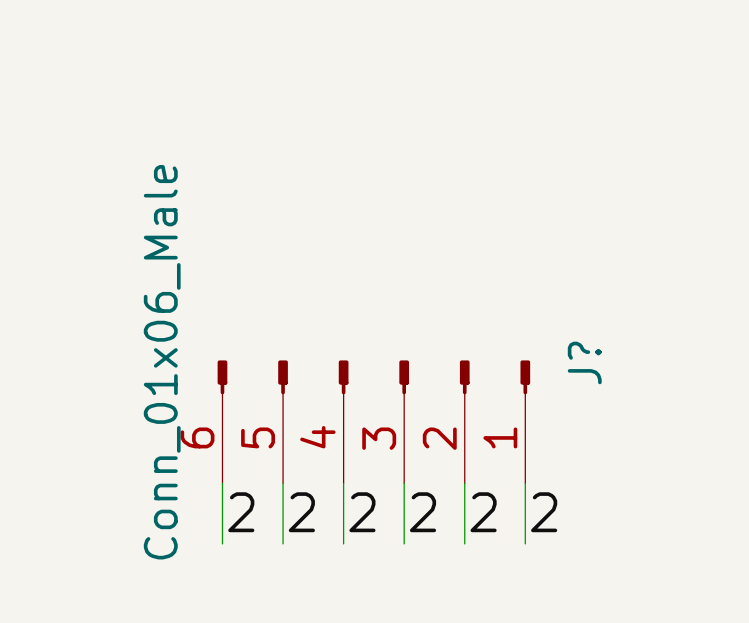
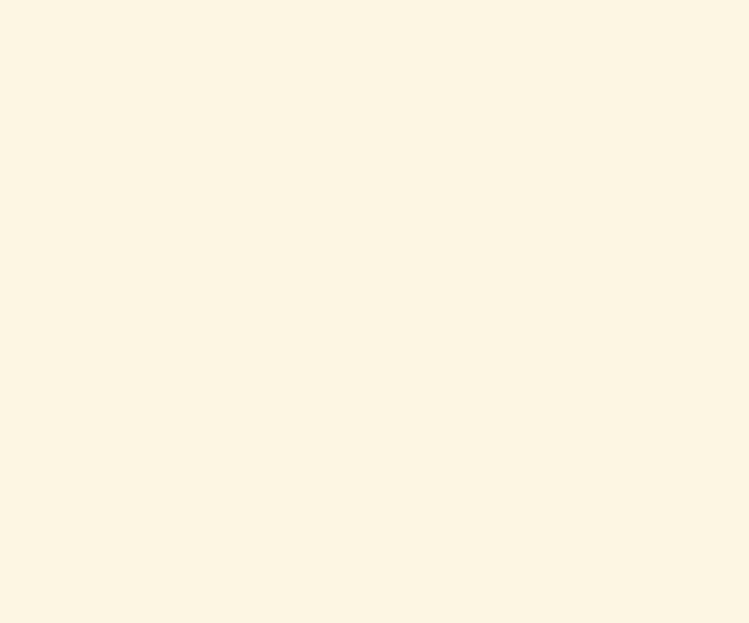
J?: Conn_01x06_Male (373, 421) -> none
wire: (222, 483) (222, 543) -> none
wire: (283, 483) (283, 543) -> none
wire: (343, 483) (343, 543) -> none
wire: (404, 483) (404, 543) -> none
wire: (464, 483) (464, 543) -> none
wire: (525, 483) (525, 543) -> none
label: 2 (241, 512) -> none
label: 2 (301, 512) -> none
label: 2 (362, 512) -> none
label: 2 (423, 512) -> none
label: 2 (483, 512) -> none
label: 2 (544, 512) -> none

